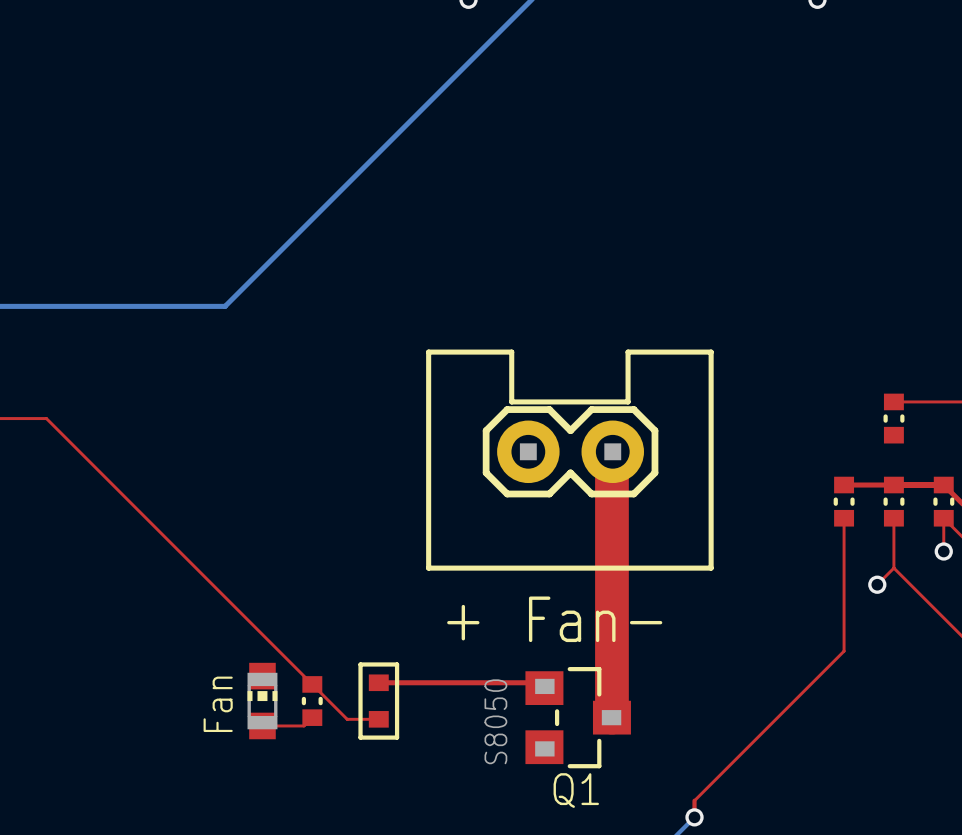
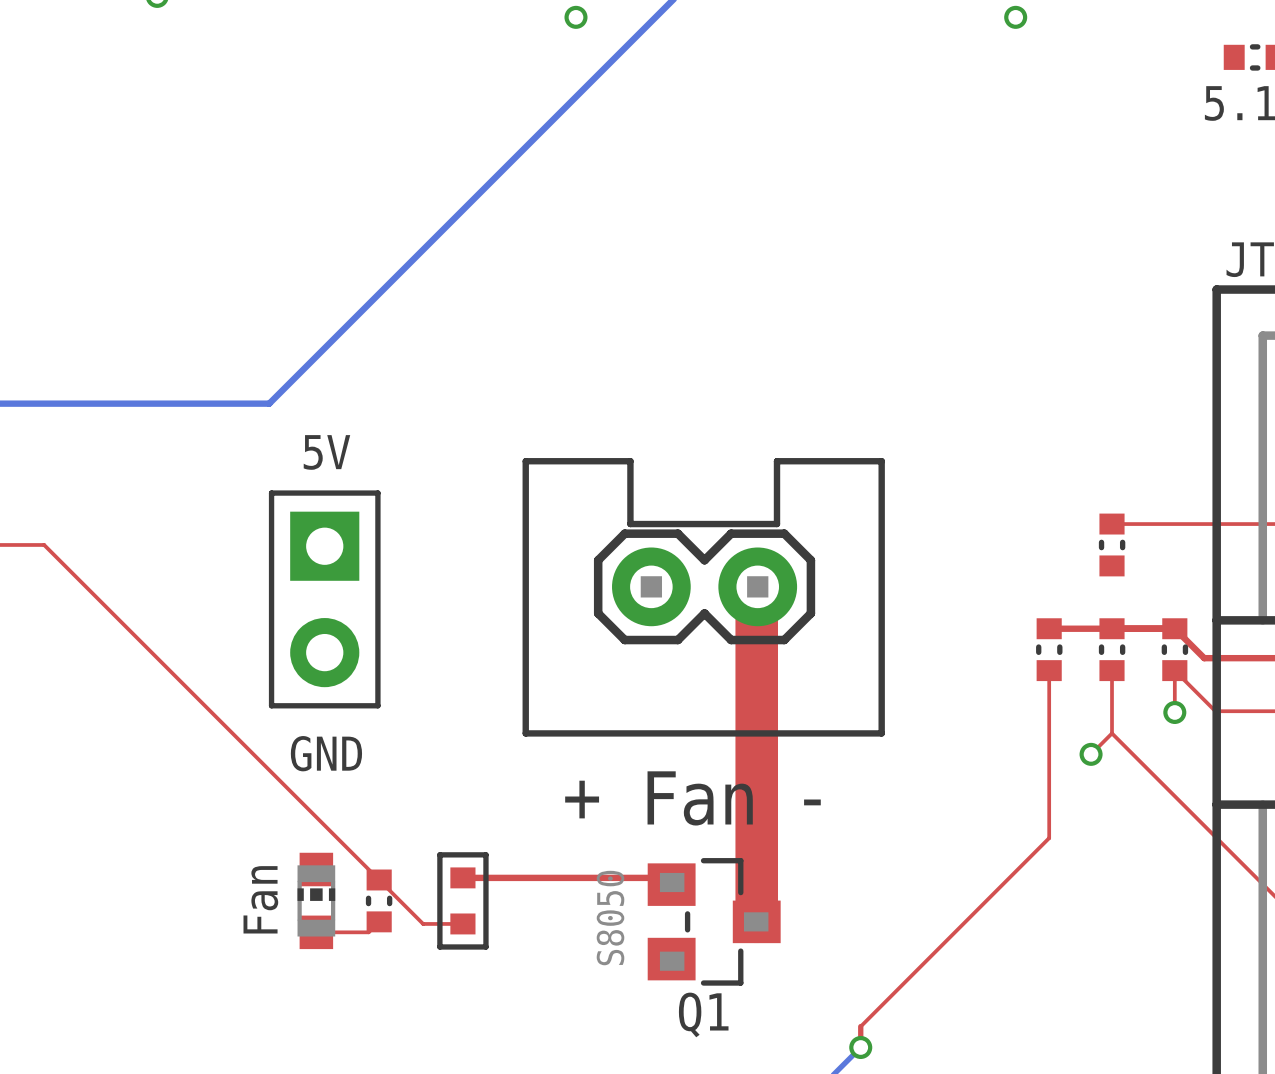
text: none -> 5V (326, 452)
part: none -> (324, 599)
text: none -> GND (326, 753)

